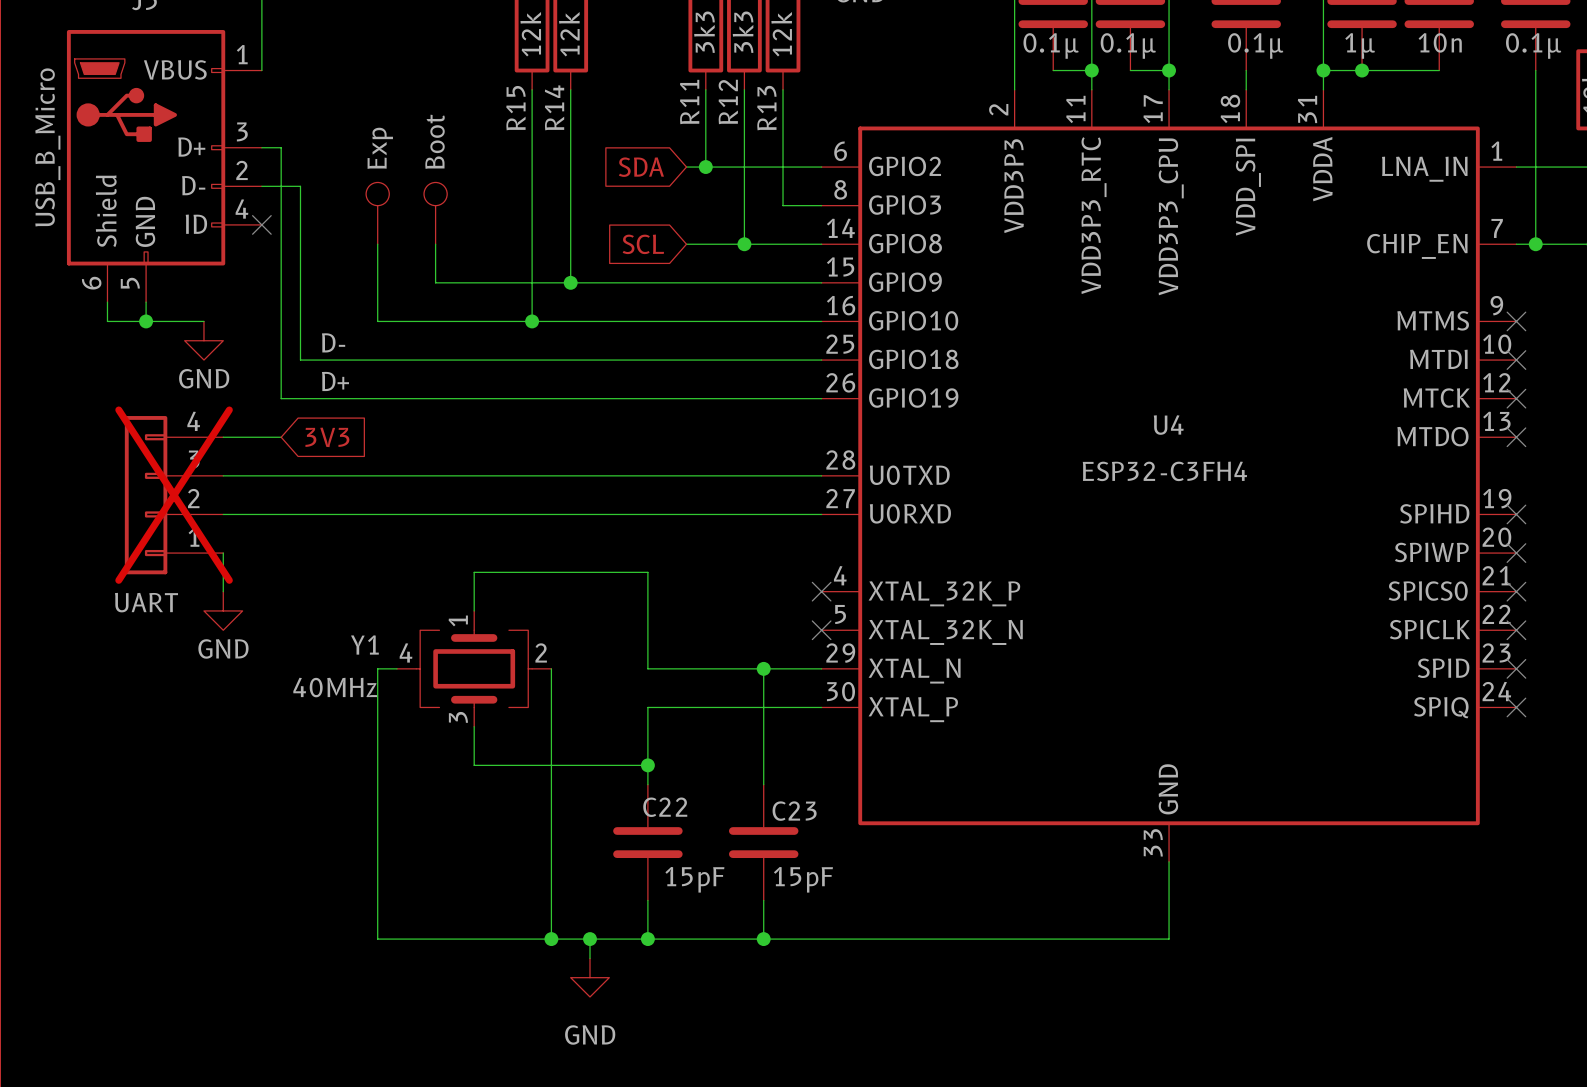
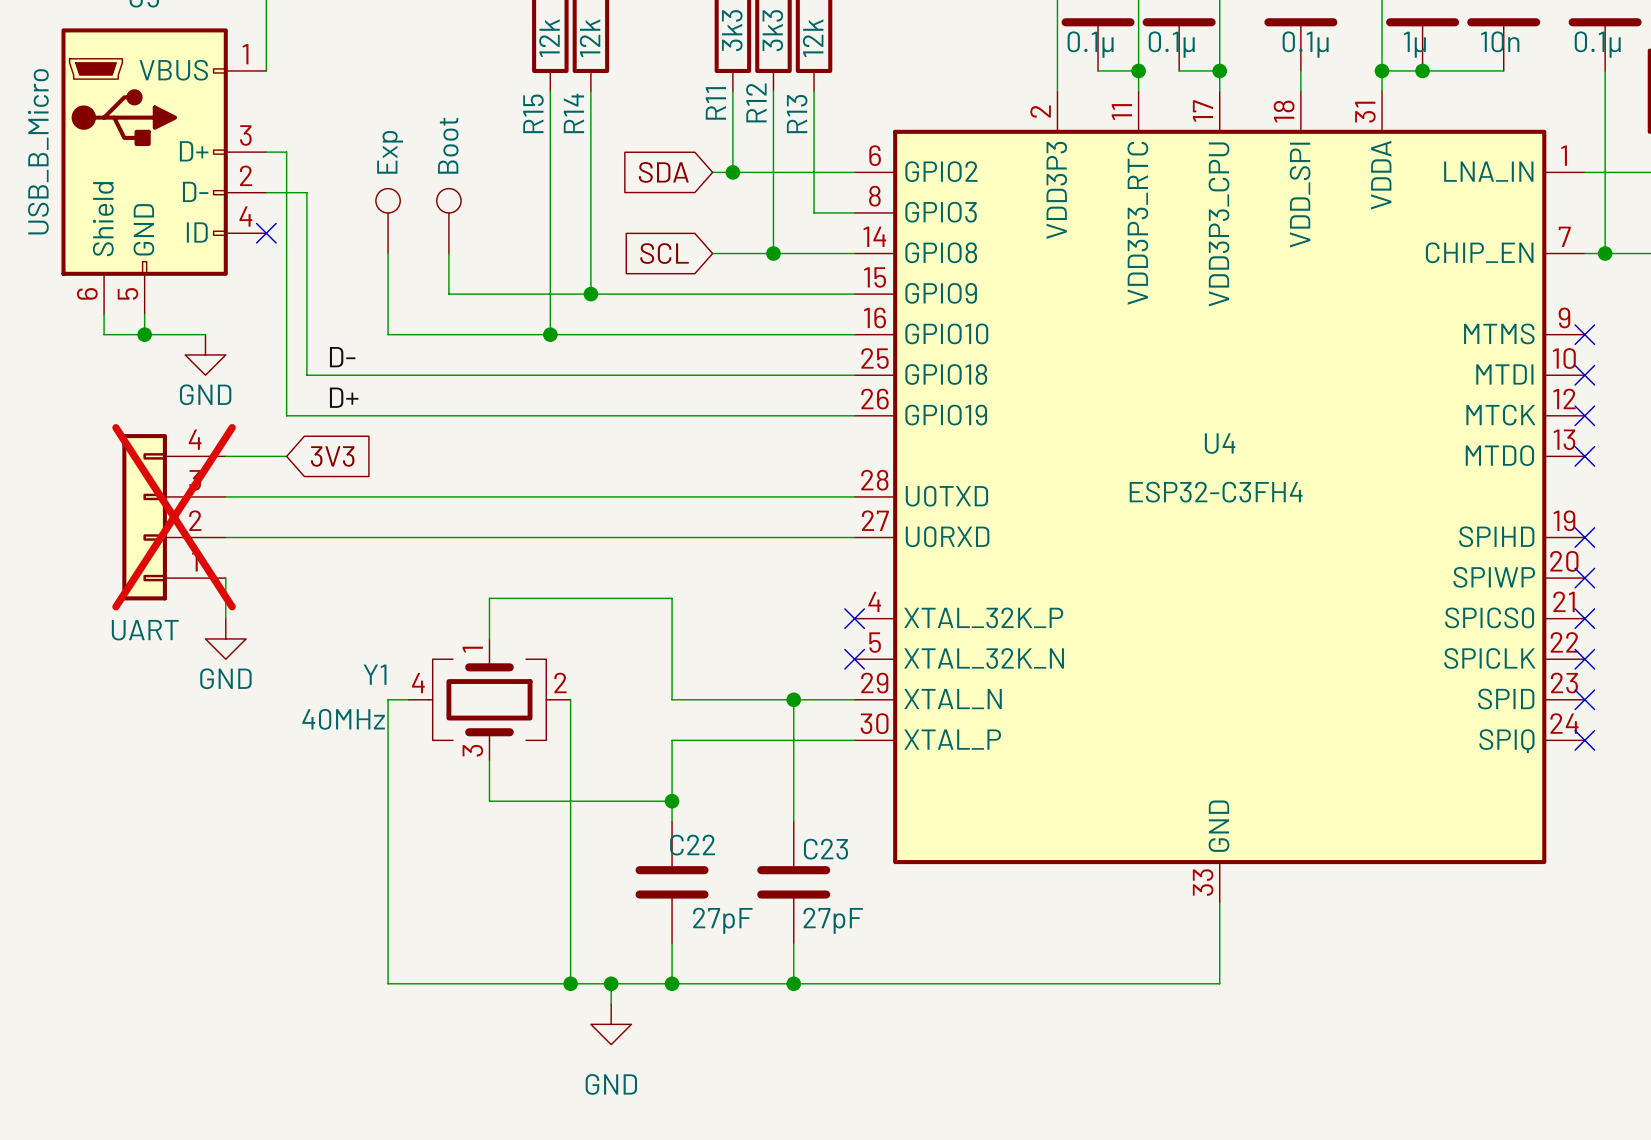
C22 value: 15pF (694, 879) -> 27pF (722, 920)
C23 value: 15pF (803, 879) -> 27pF (833, 920)

